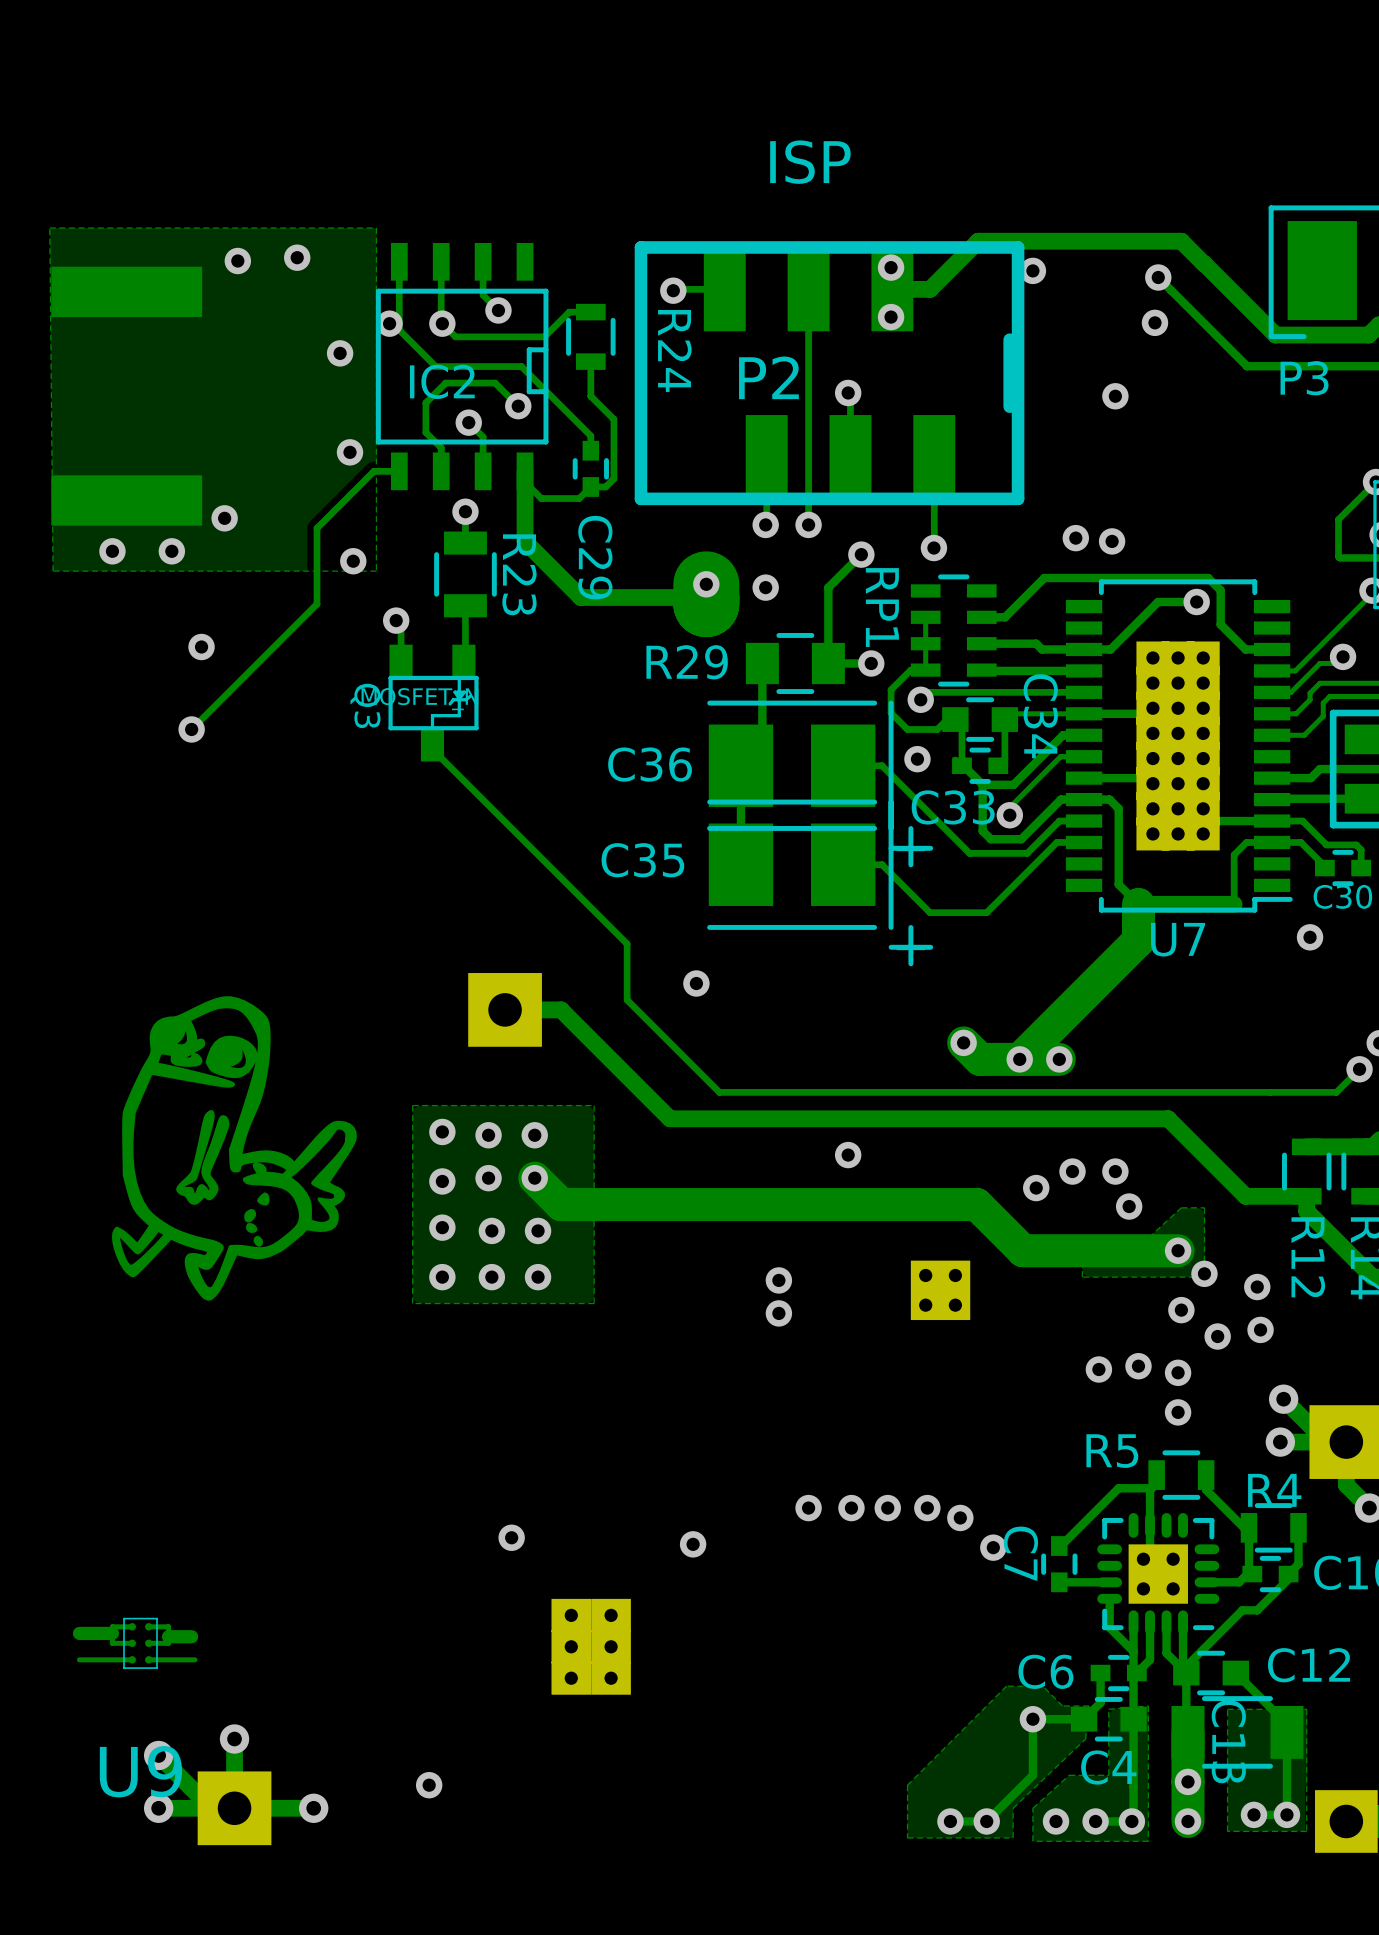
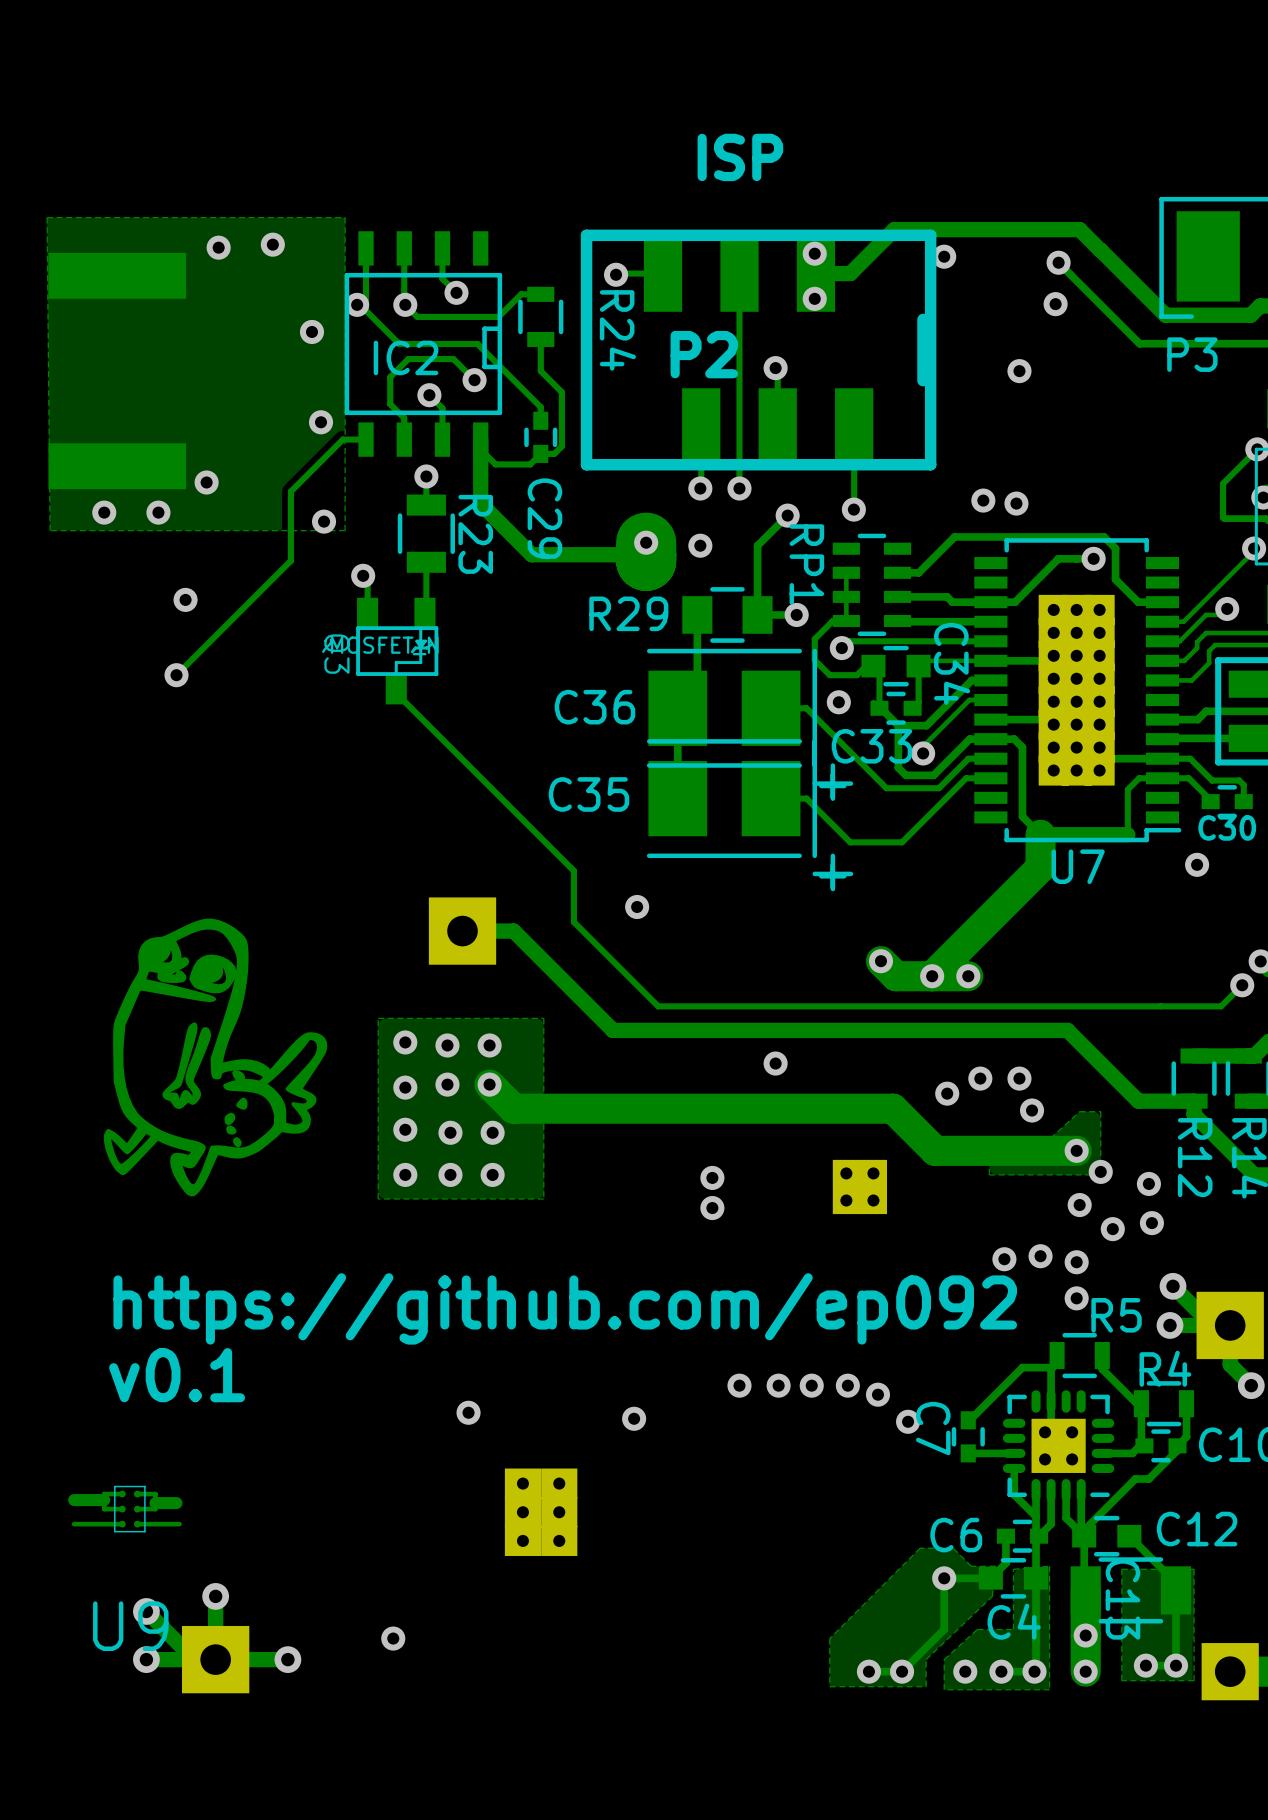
text: none -> https://github.com/ep092 (565, 1308)
R5 name position: R5 (1112, 1451) -> R5 (1116, 1315)
text: none -> v0.1 (177, 1375)

